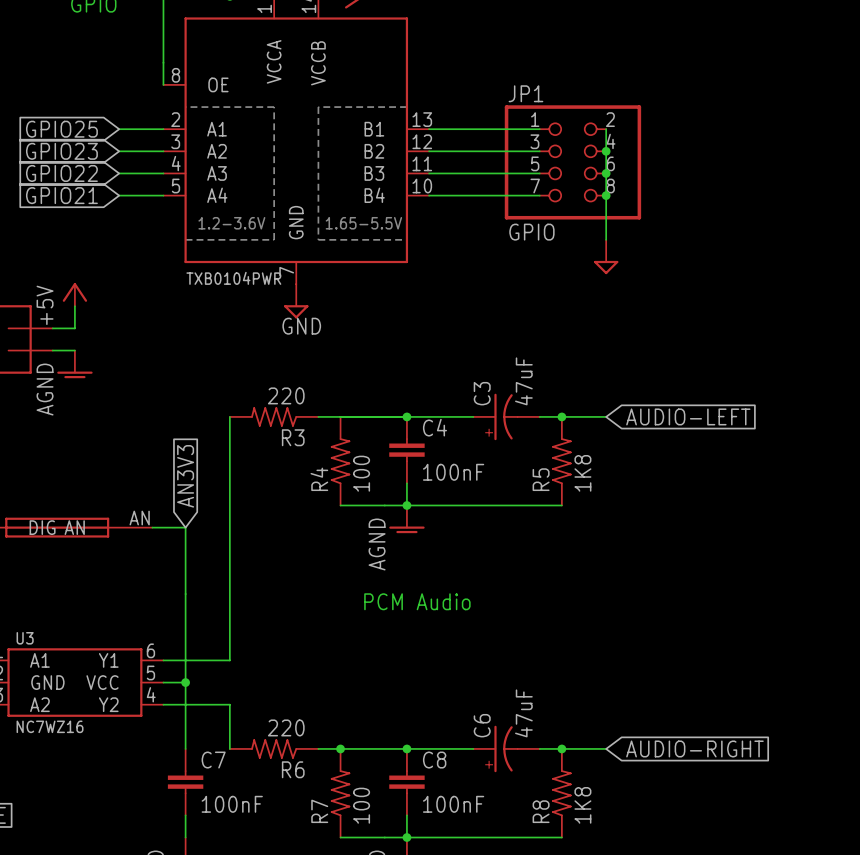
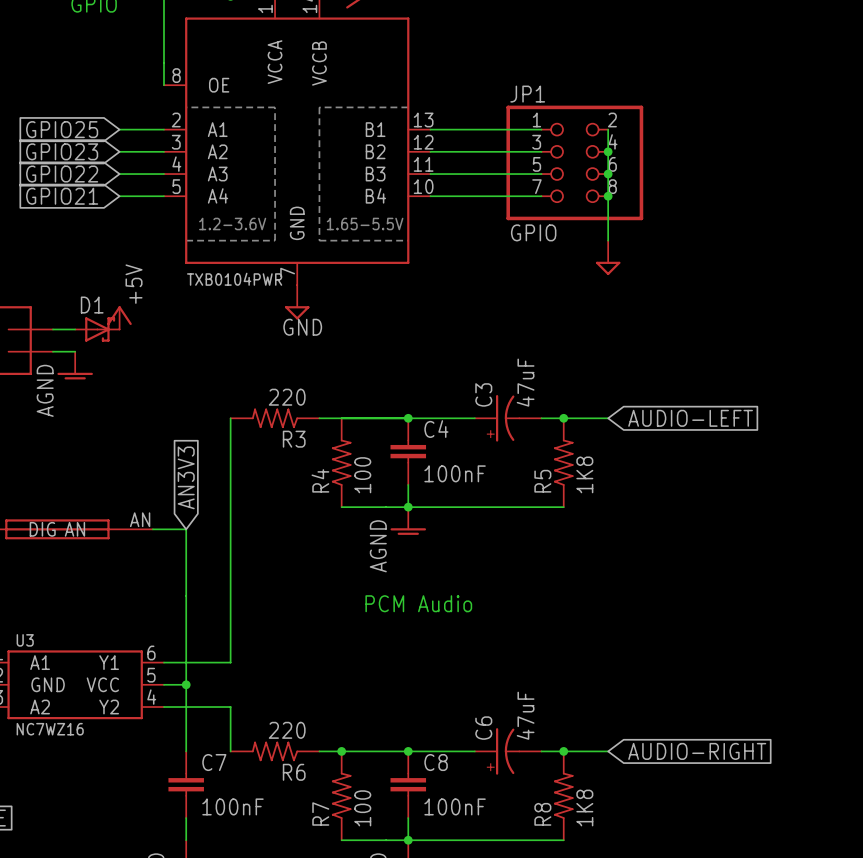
power symbol position: +5V (74, 294) -> +5V (119, 317)
power symbol text position: +5V (45, 305) -> +5V (134, 284)
wire: (74, 306) (74, 328) -> none
D1: none -> (97, 329)

